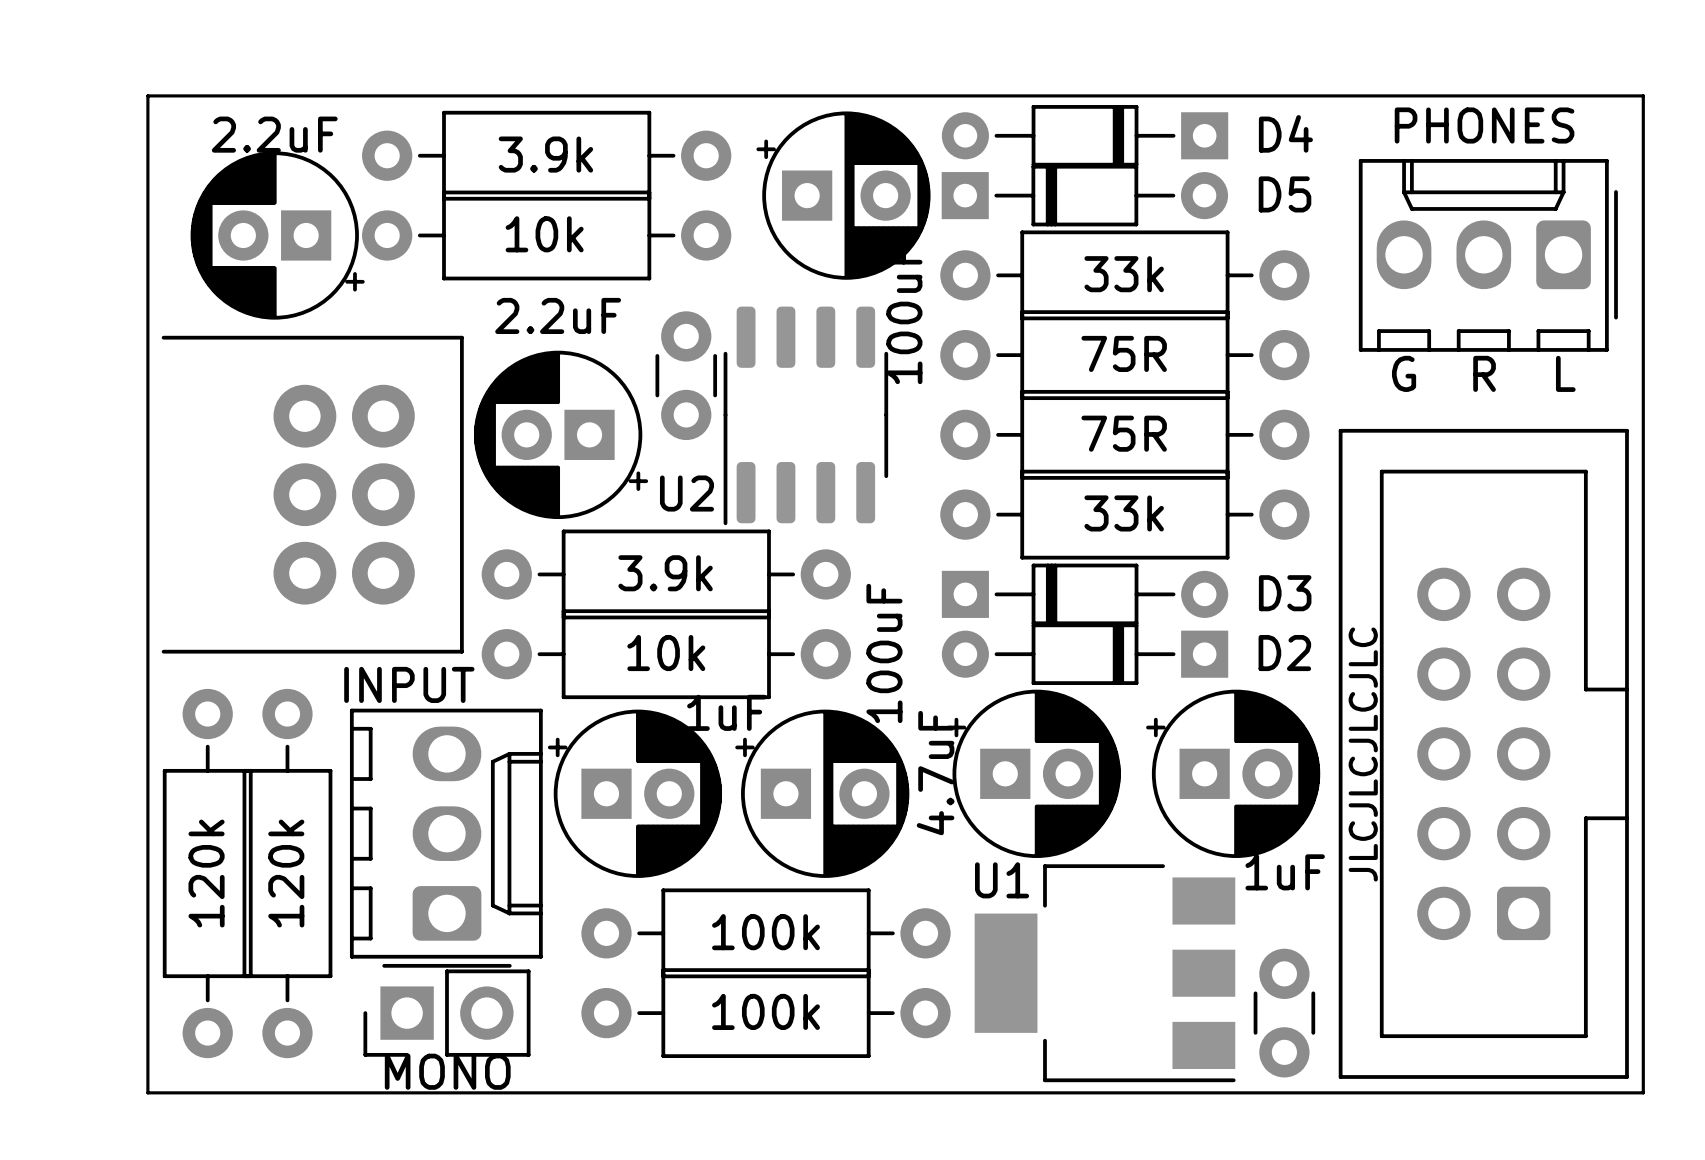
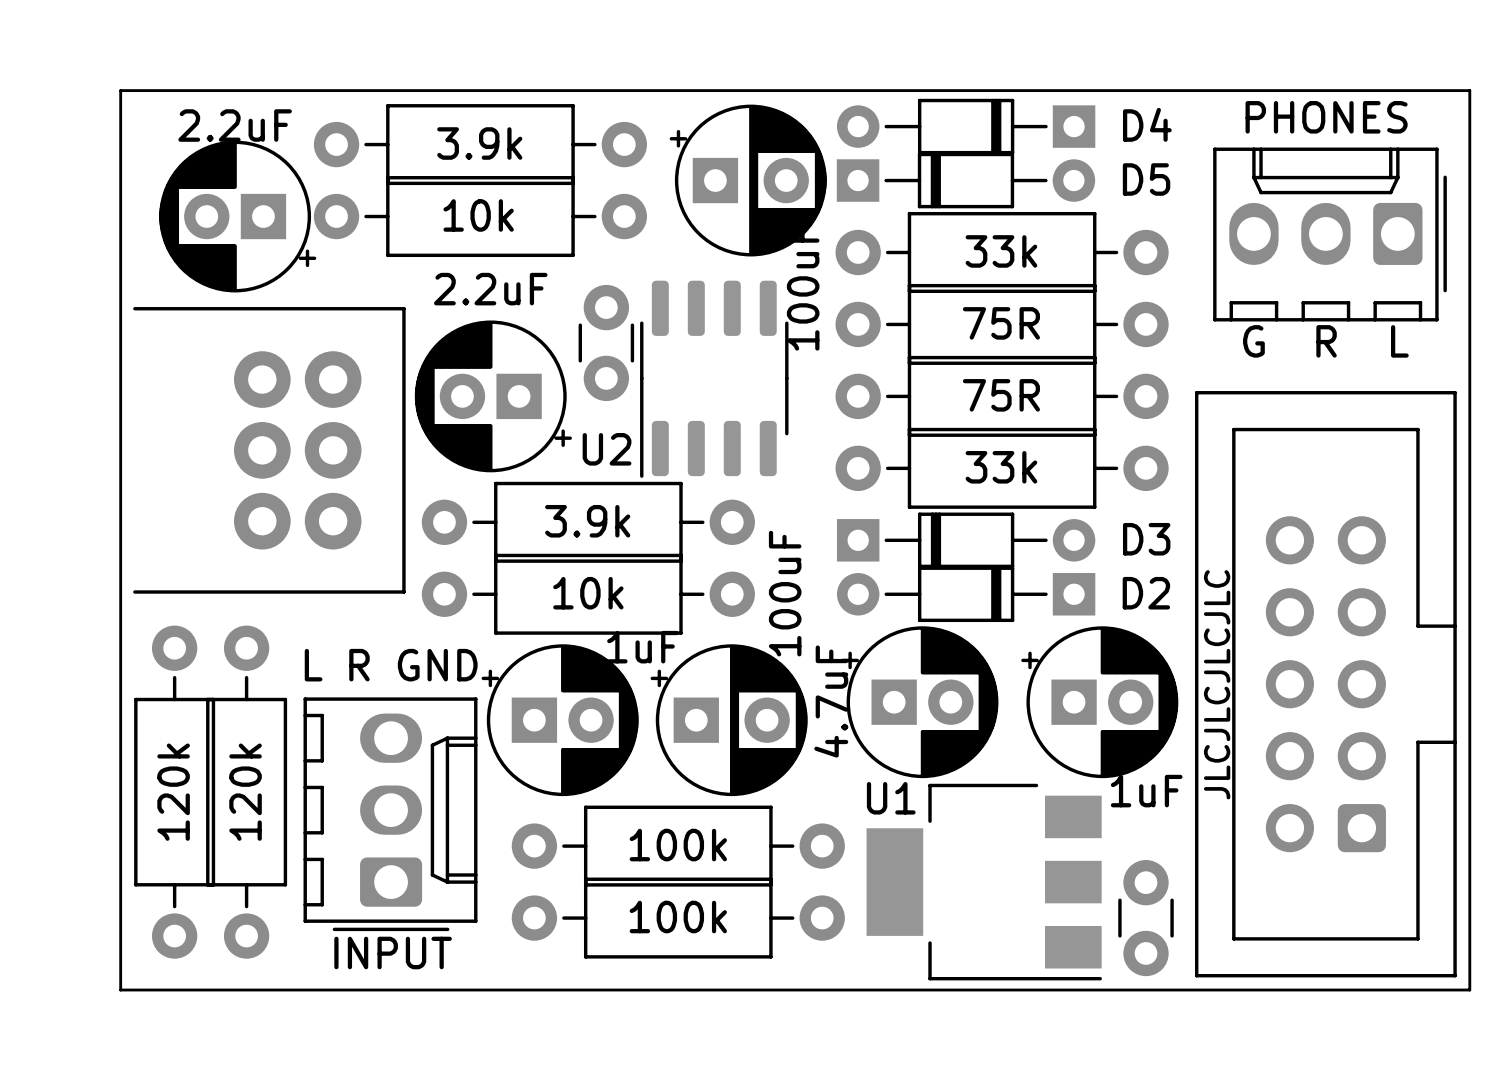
part value position: INPUT (409, 684) -> INPUT (393, 952)
text: none -> L R GND (391, 665)
part position: (446, 838) -> (390, 814)
part: MONO (446, 1013) -> none

